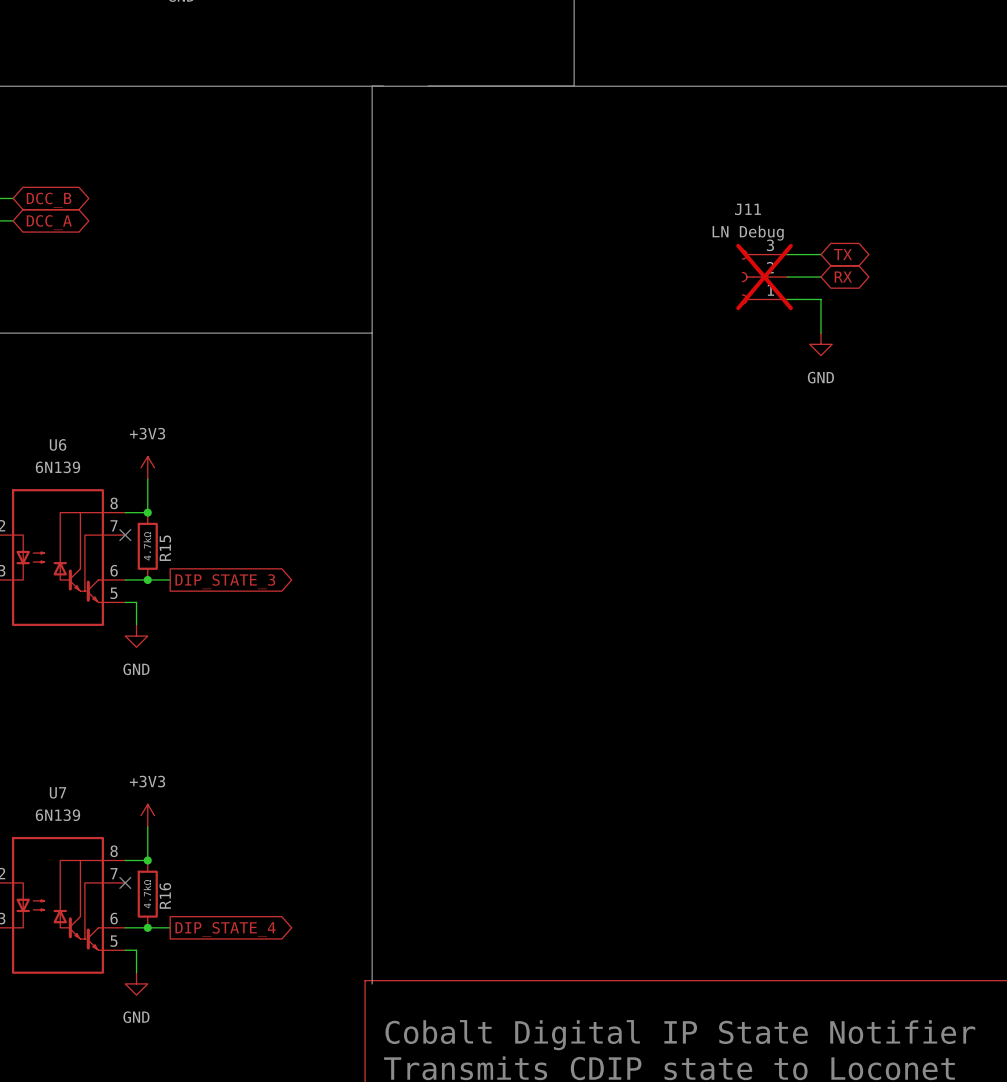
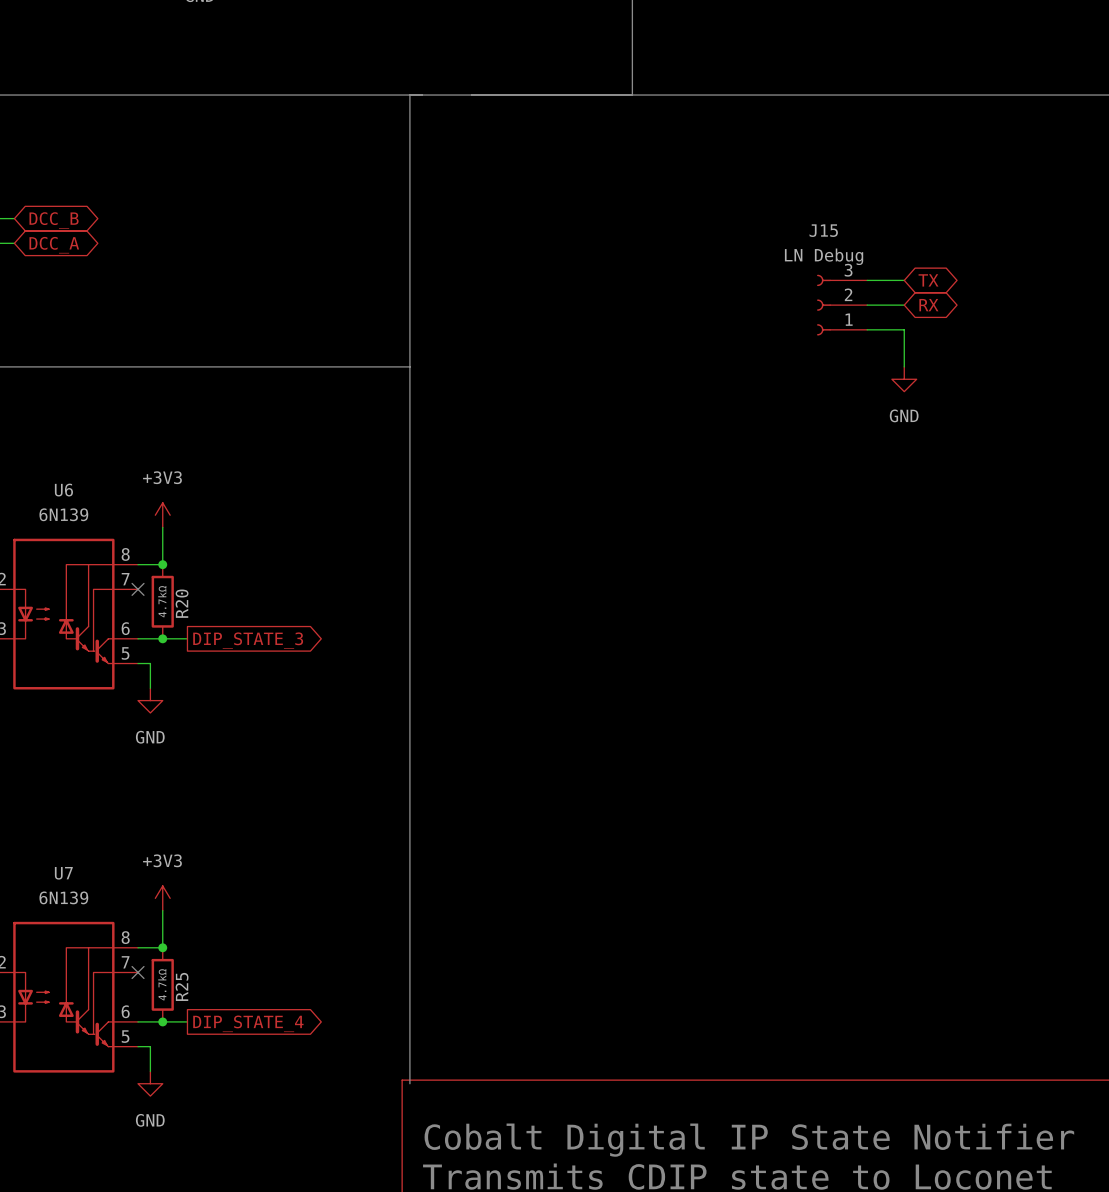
J11 name: J11 (747, 209) -> J15 (823, 230)
J11 do-not-place cross: (764, 277) -> none
R15 name: R15 (165, 548) -> R20 (182, 603)
R16 name: R16 (165, 895) -> R25 (182, 986)

